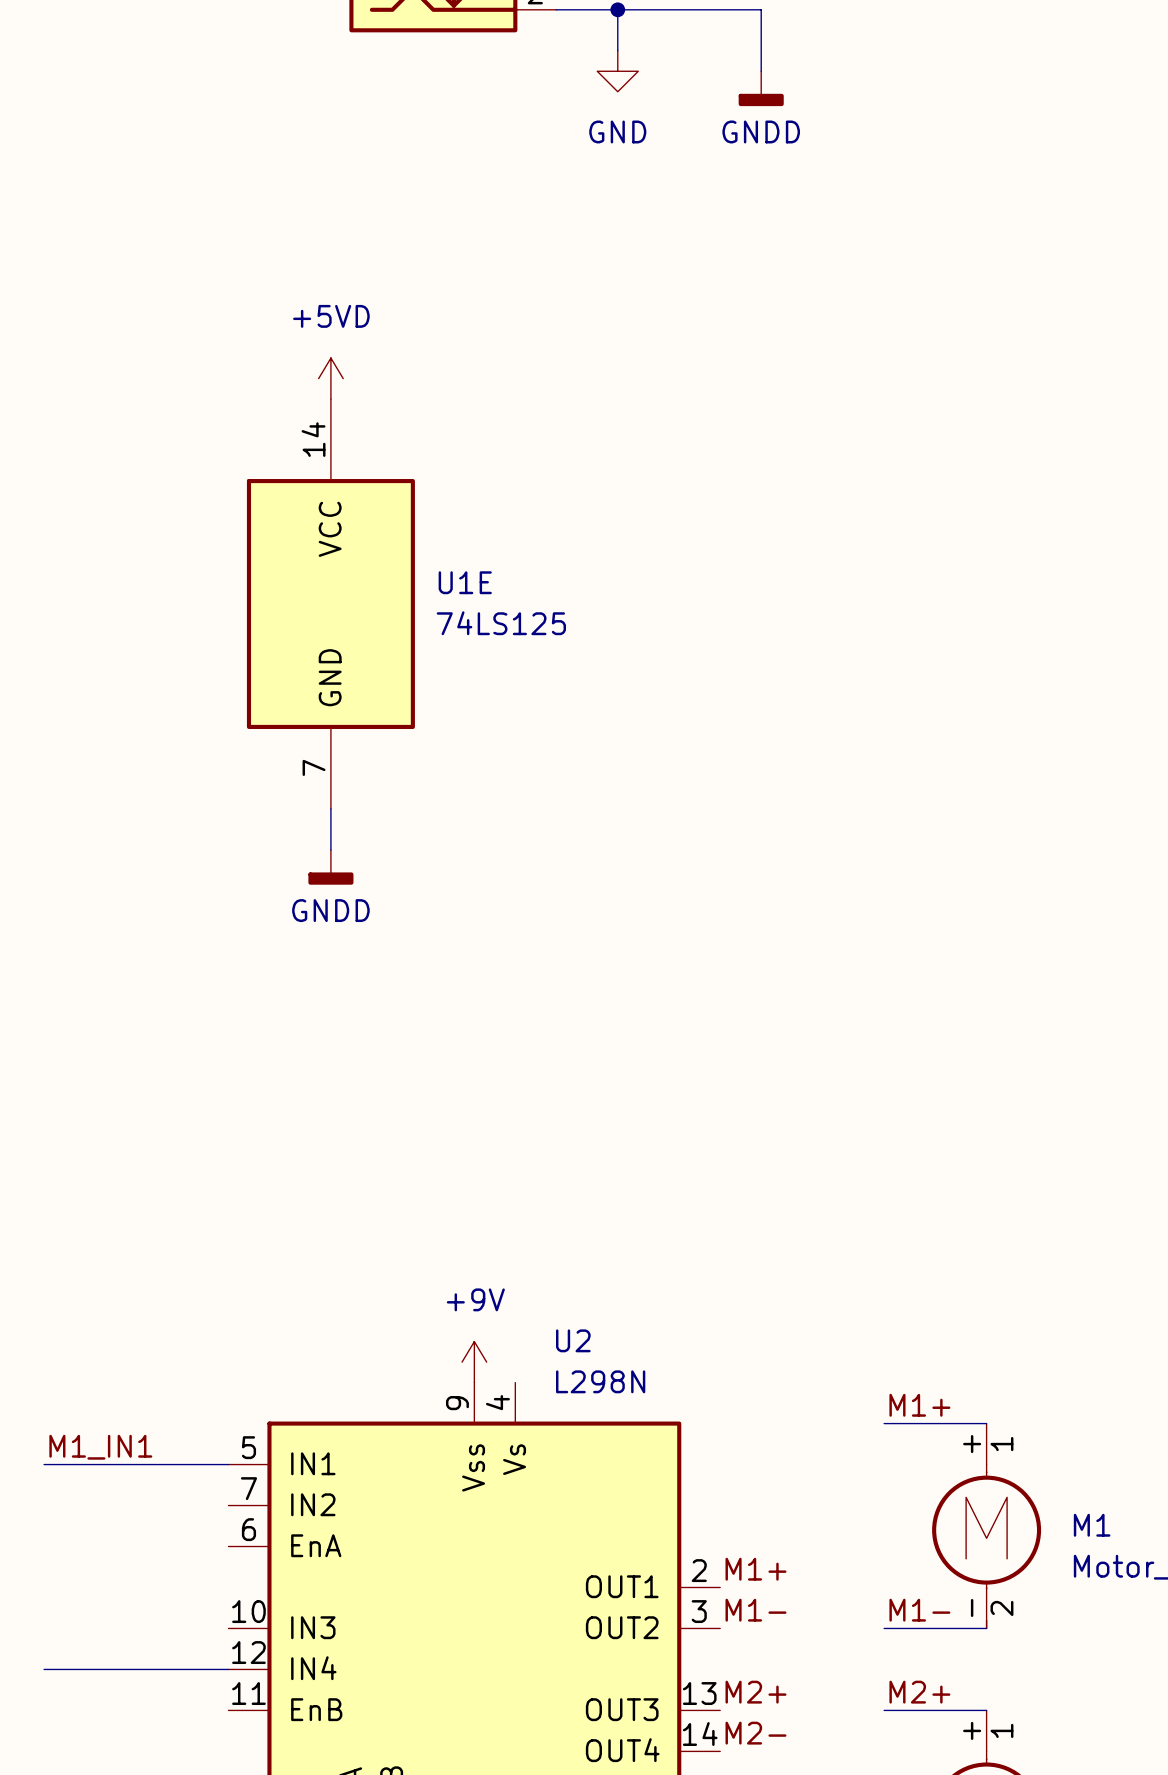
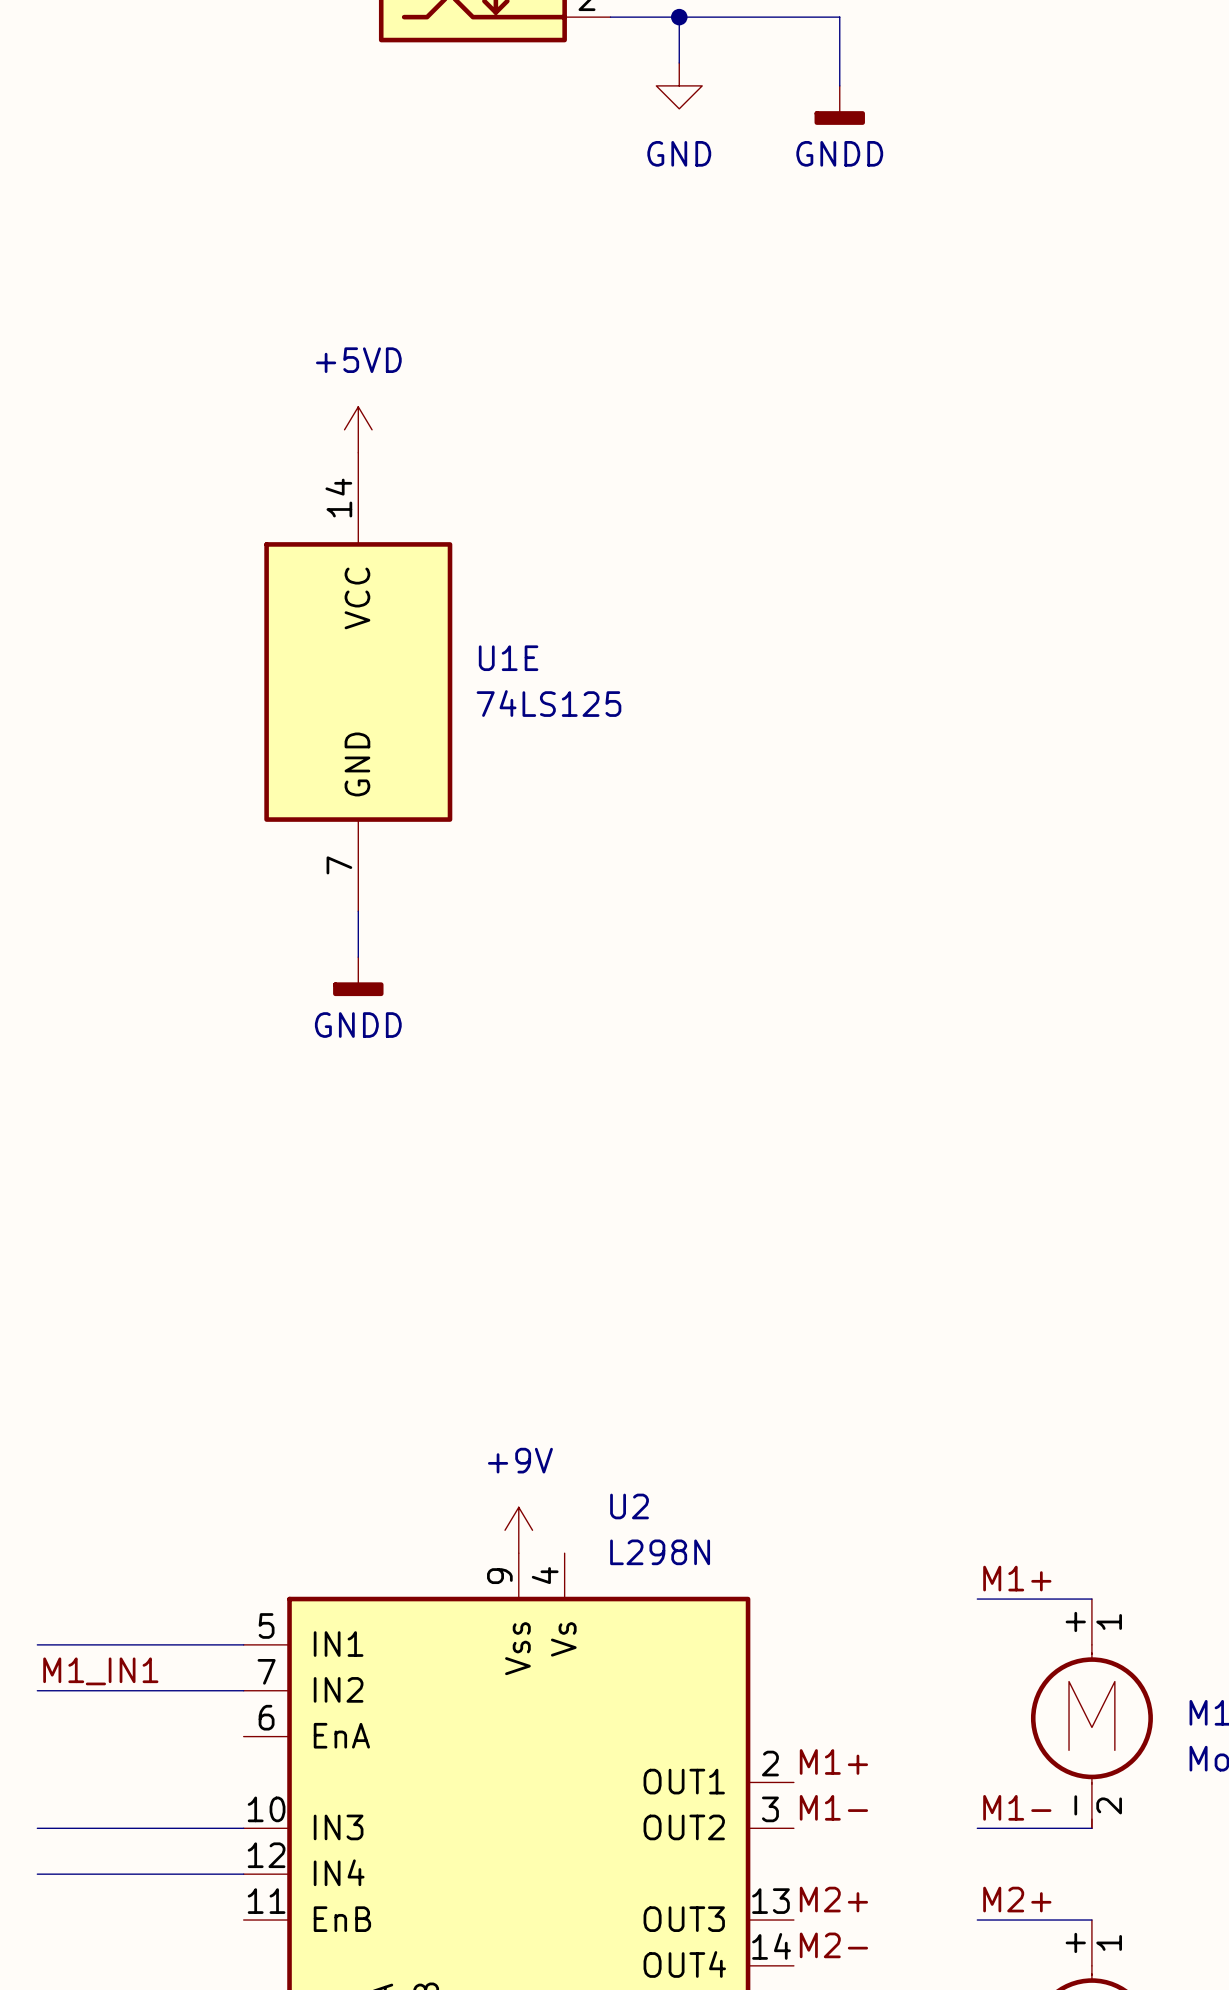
label position: M1_IN1 (100, 1447) -> M1_IN1 (100, 1671)
wire: none -> (37, 1690) (243, 1690)
wire: none -> (37, 1828) (243, 1828)

